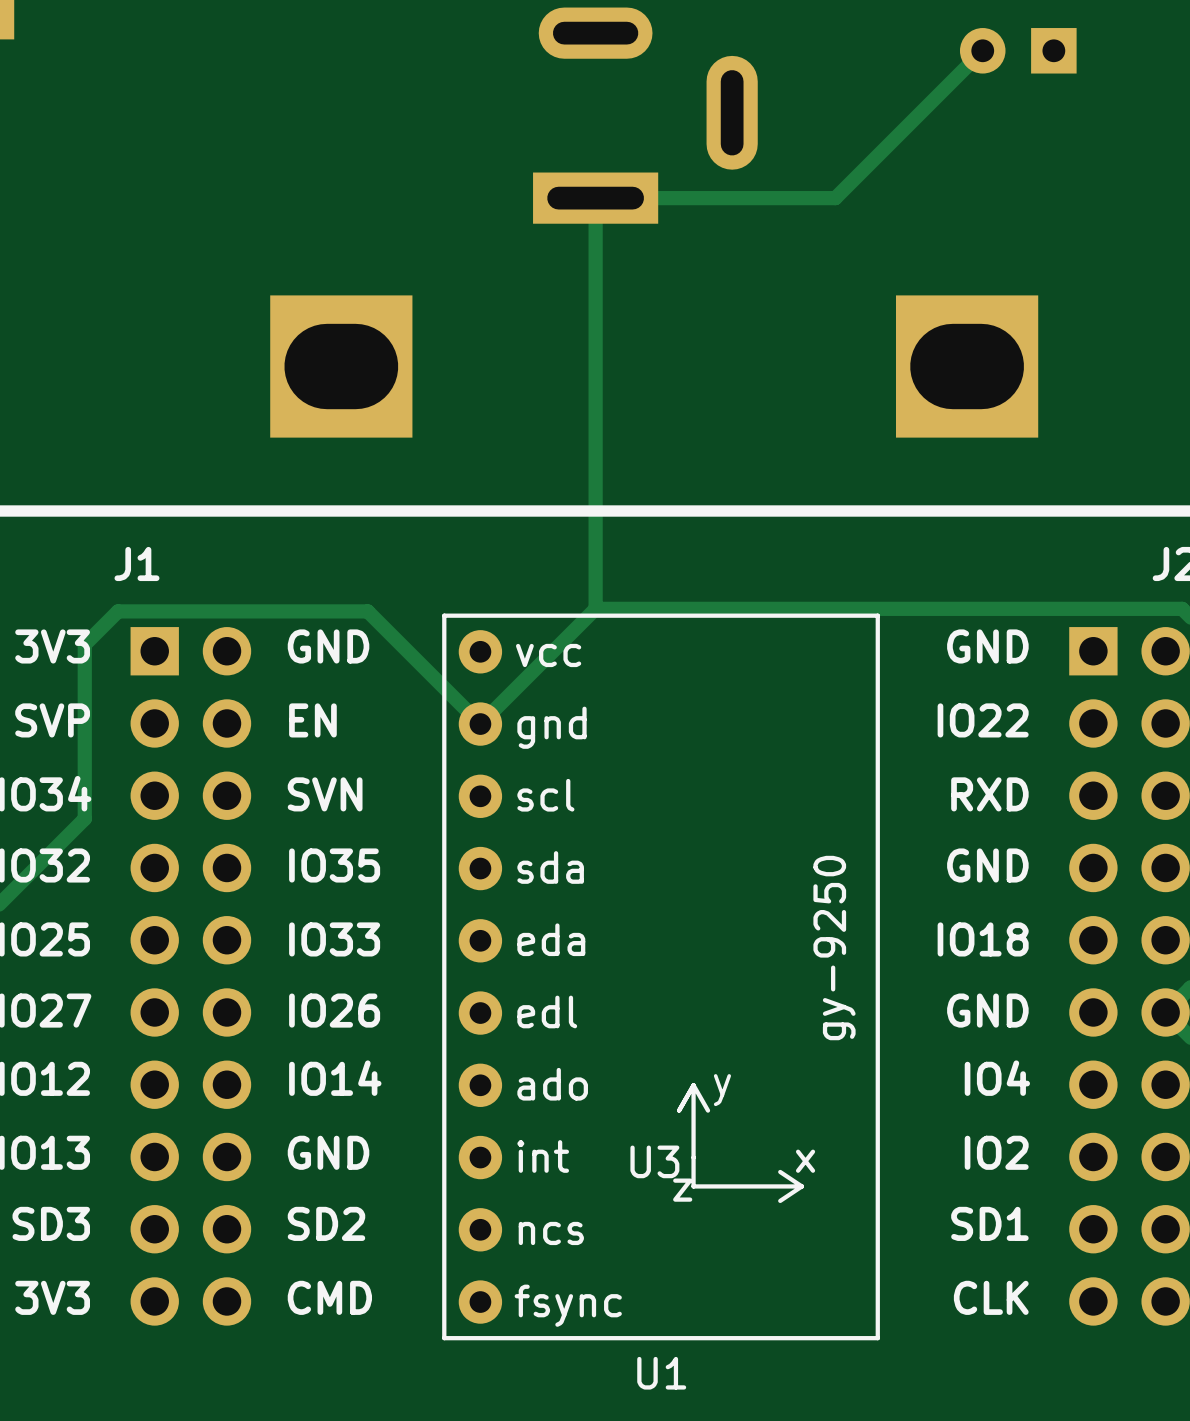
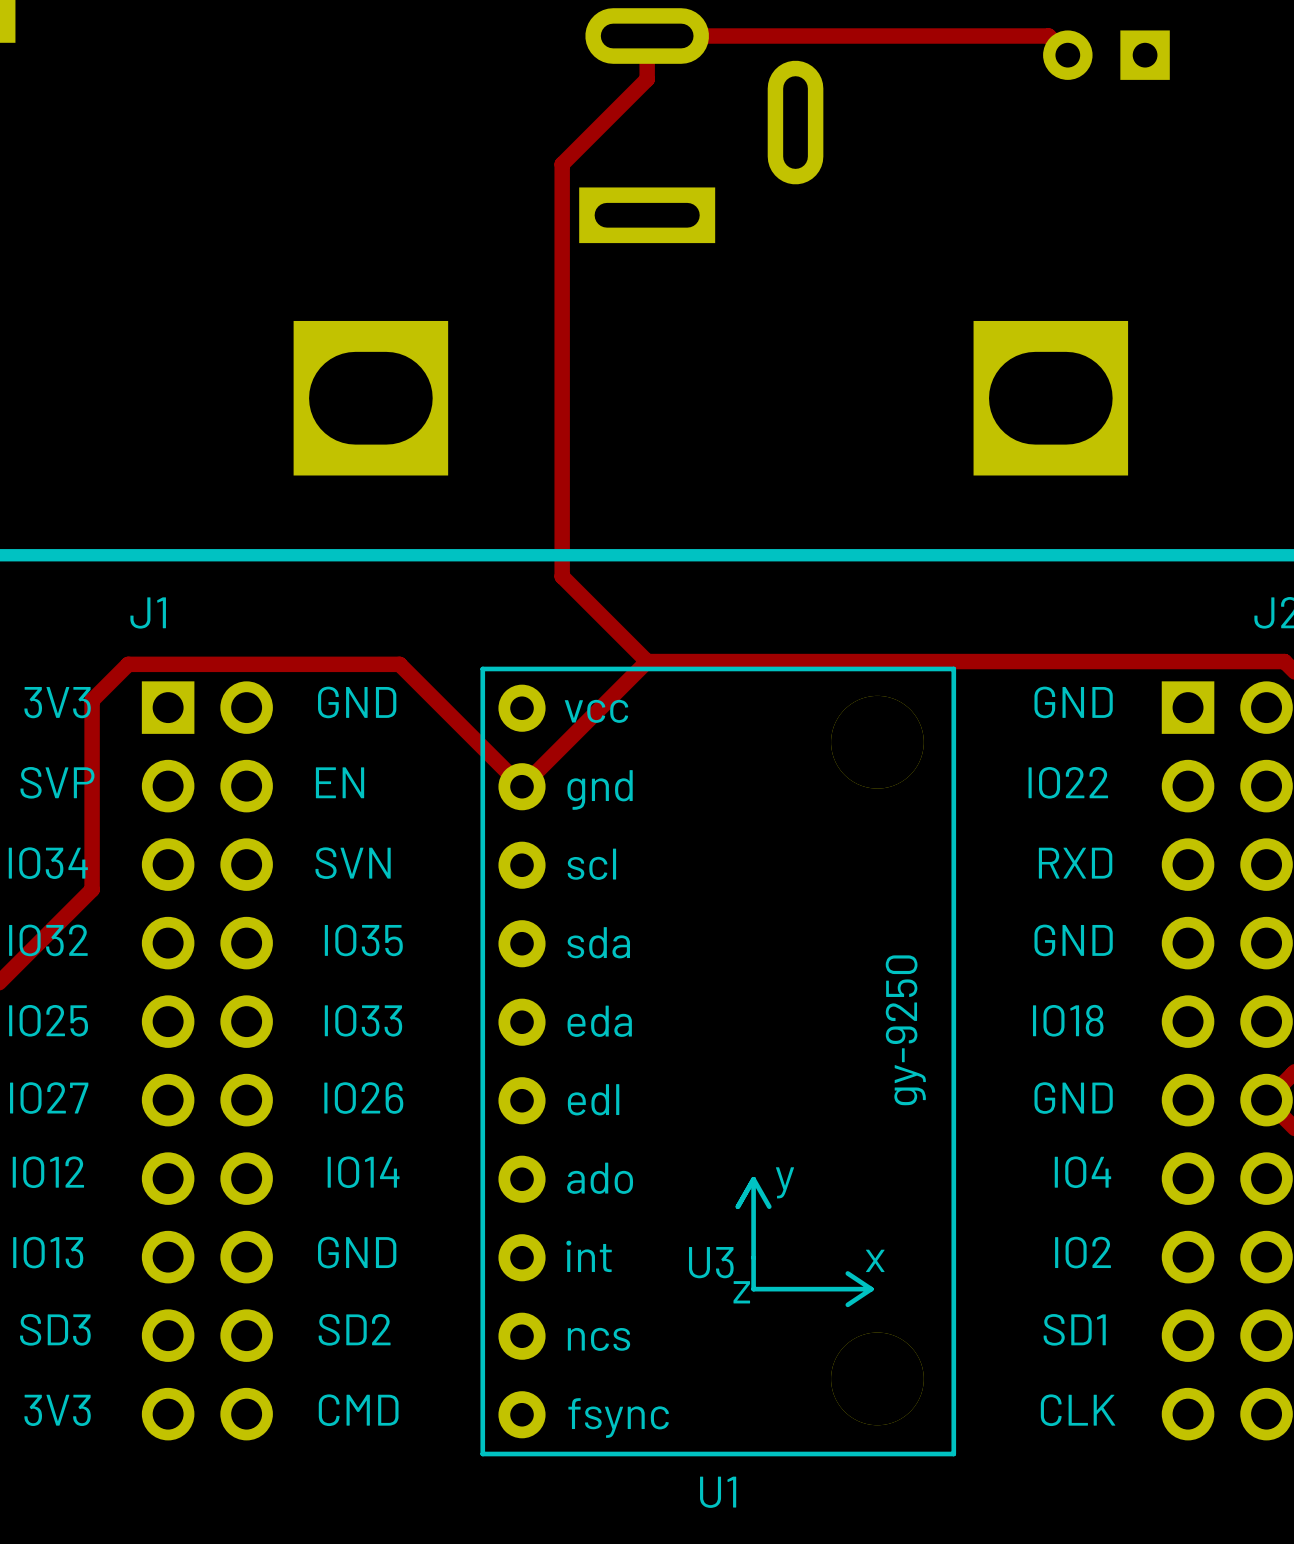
track: (982, 50) (835, 198) (595, 198) (595, 608) -> (1067, 55) (1048, 36) (647, 36) (647, 79) (562, 164) (562, 576) (647, 661)
U1 footprint: [442, 613, 880, 1341] -> [480, 666, 957, 1457]

